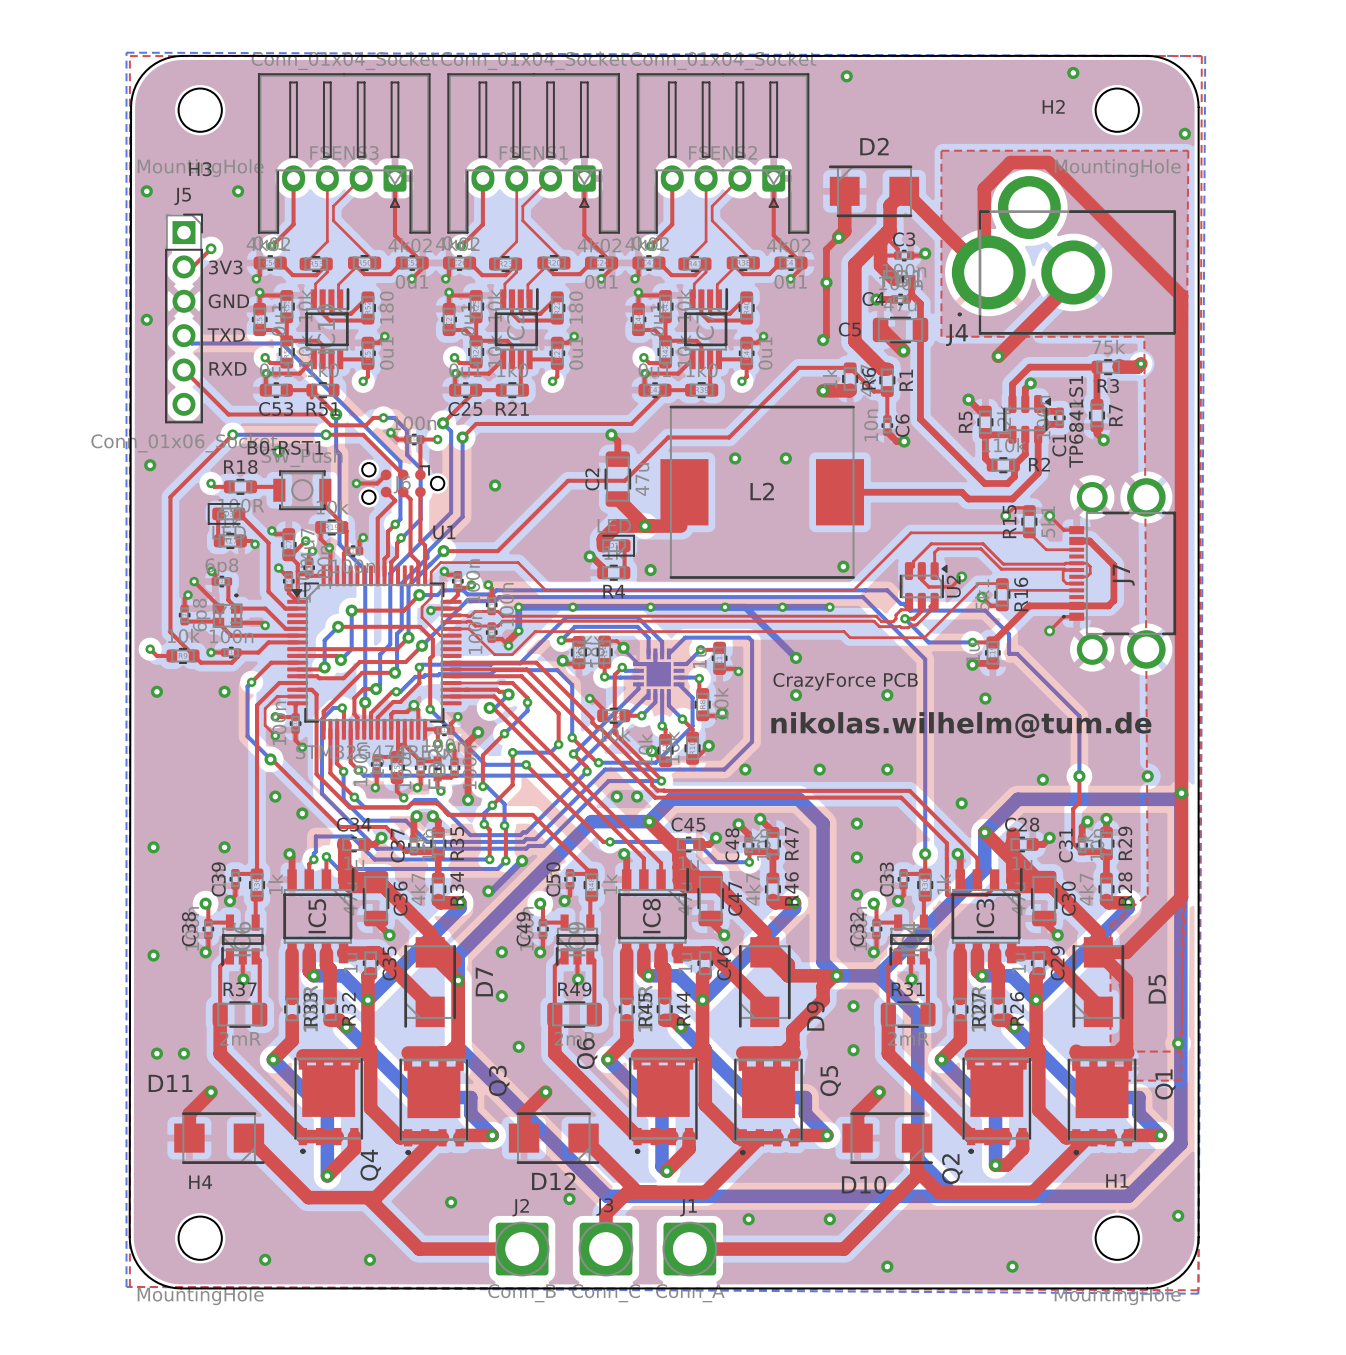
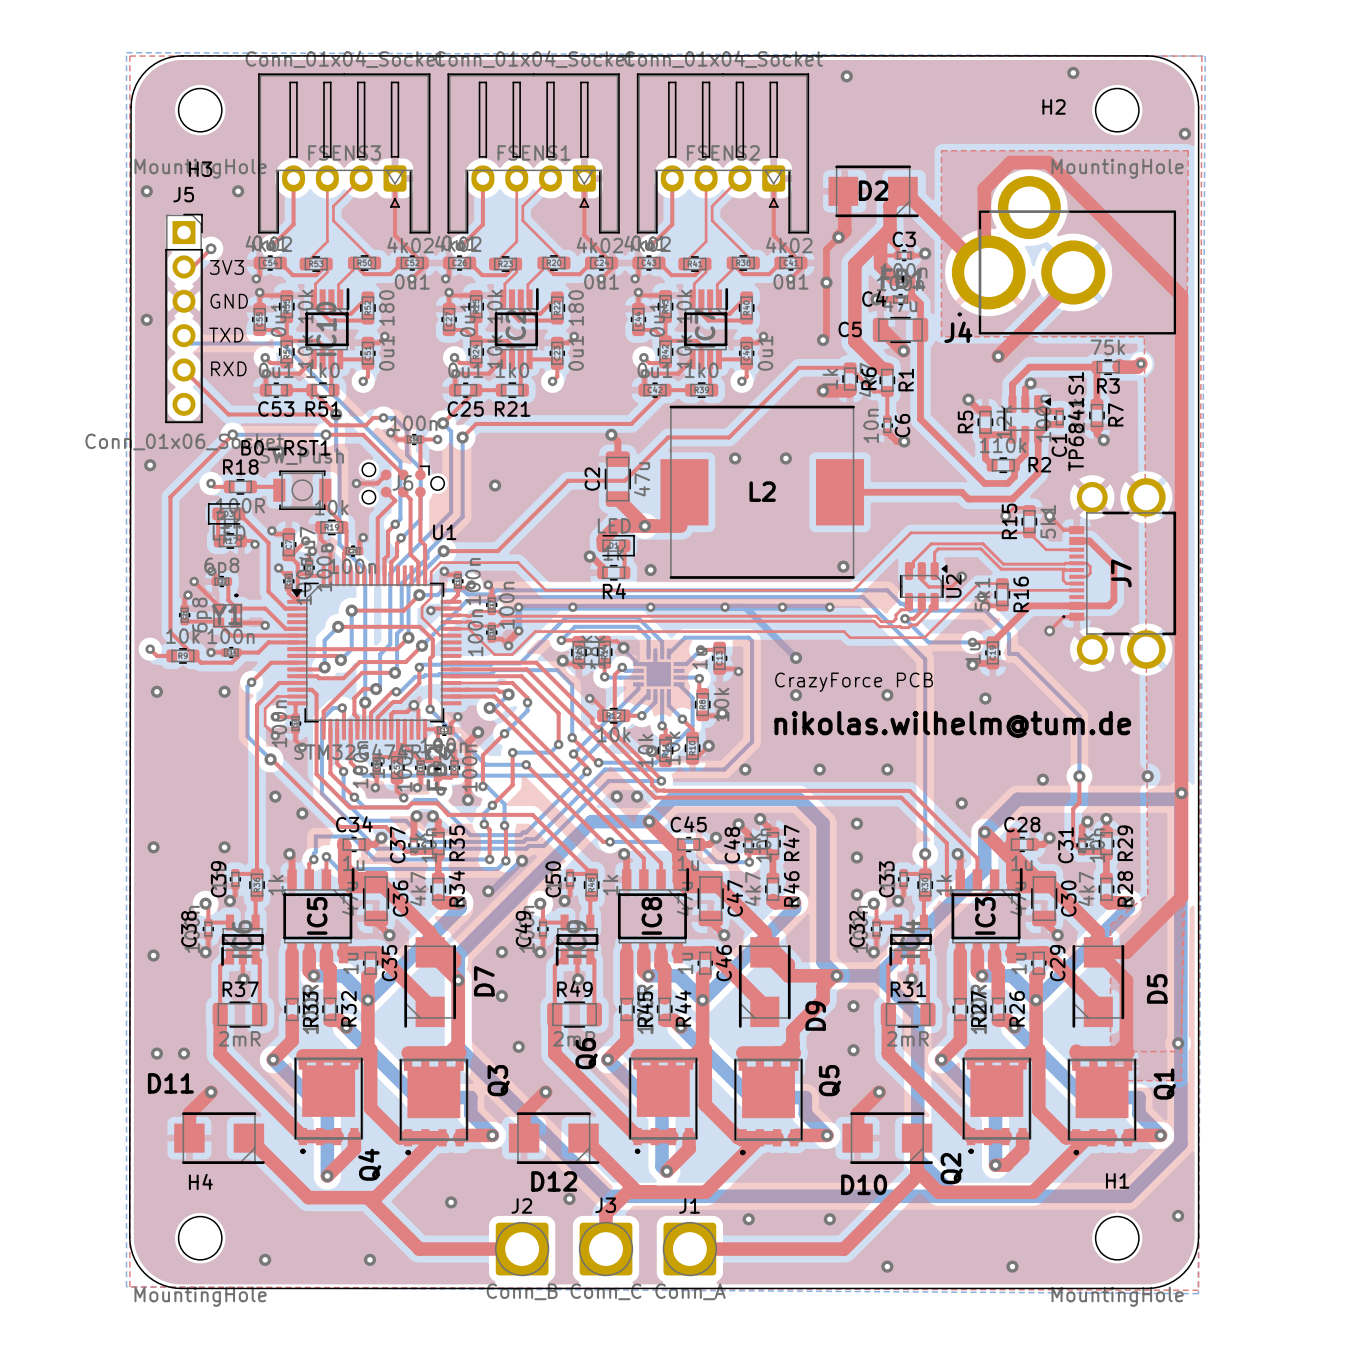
D2 name position: D2 (874, 146) -> D2 (873, 190)
D2 rotation: 0° (873, 191) -> 180° (873, 191)

